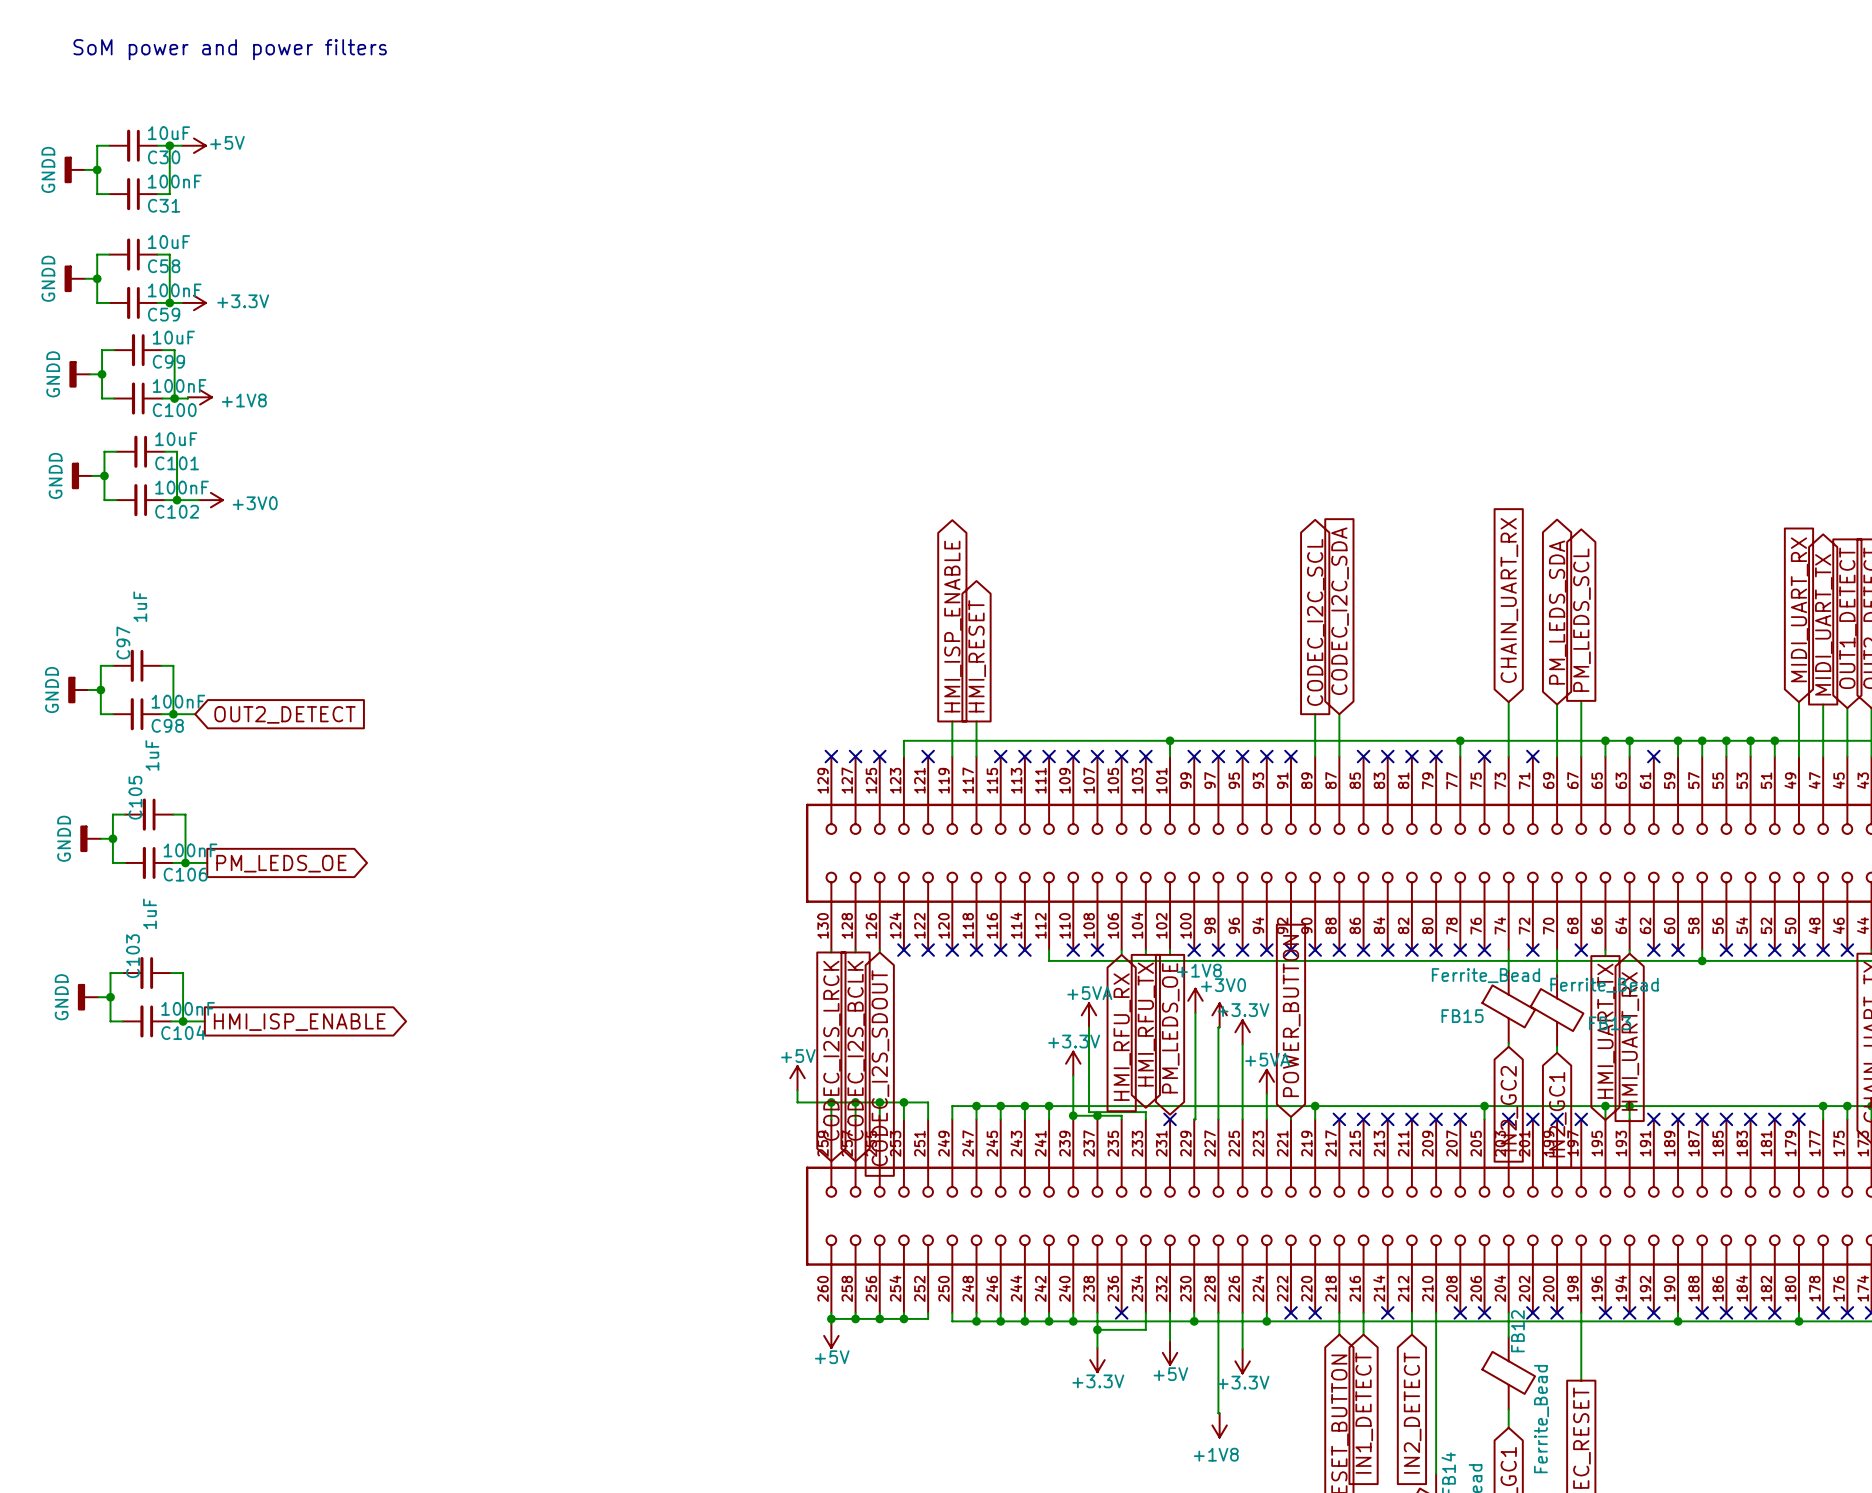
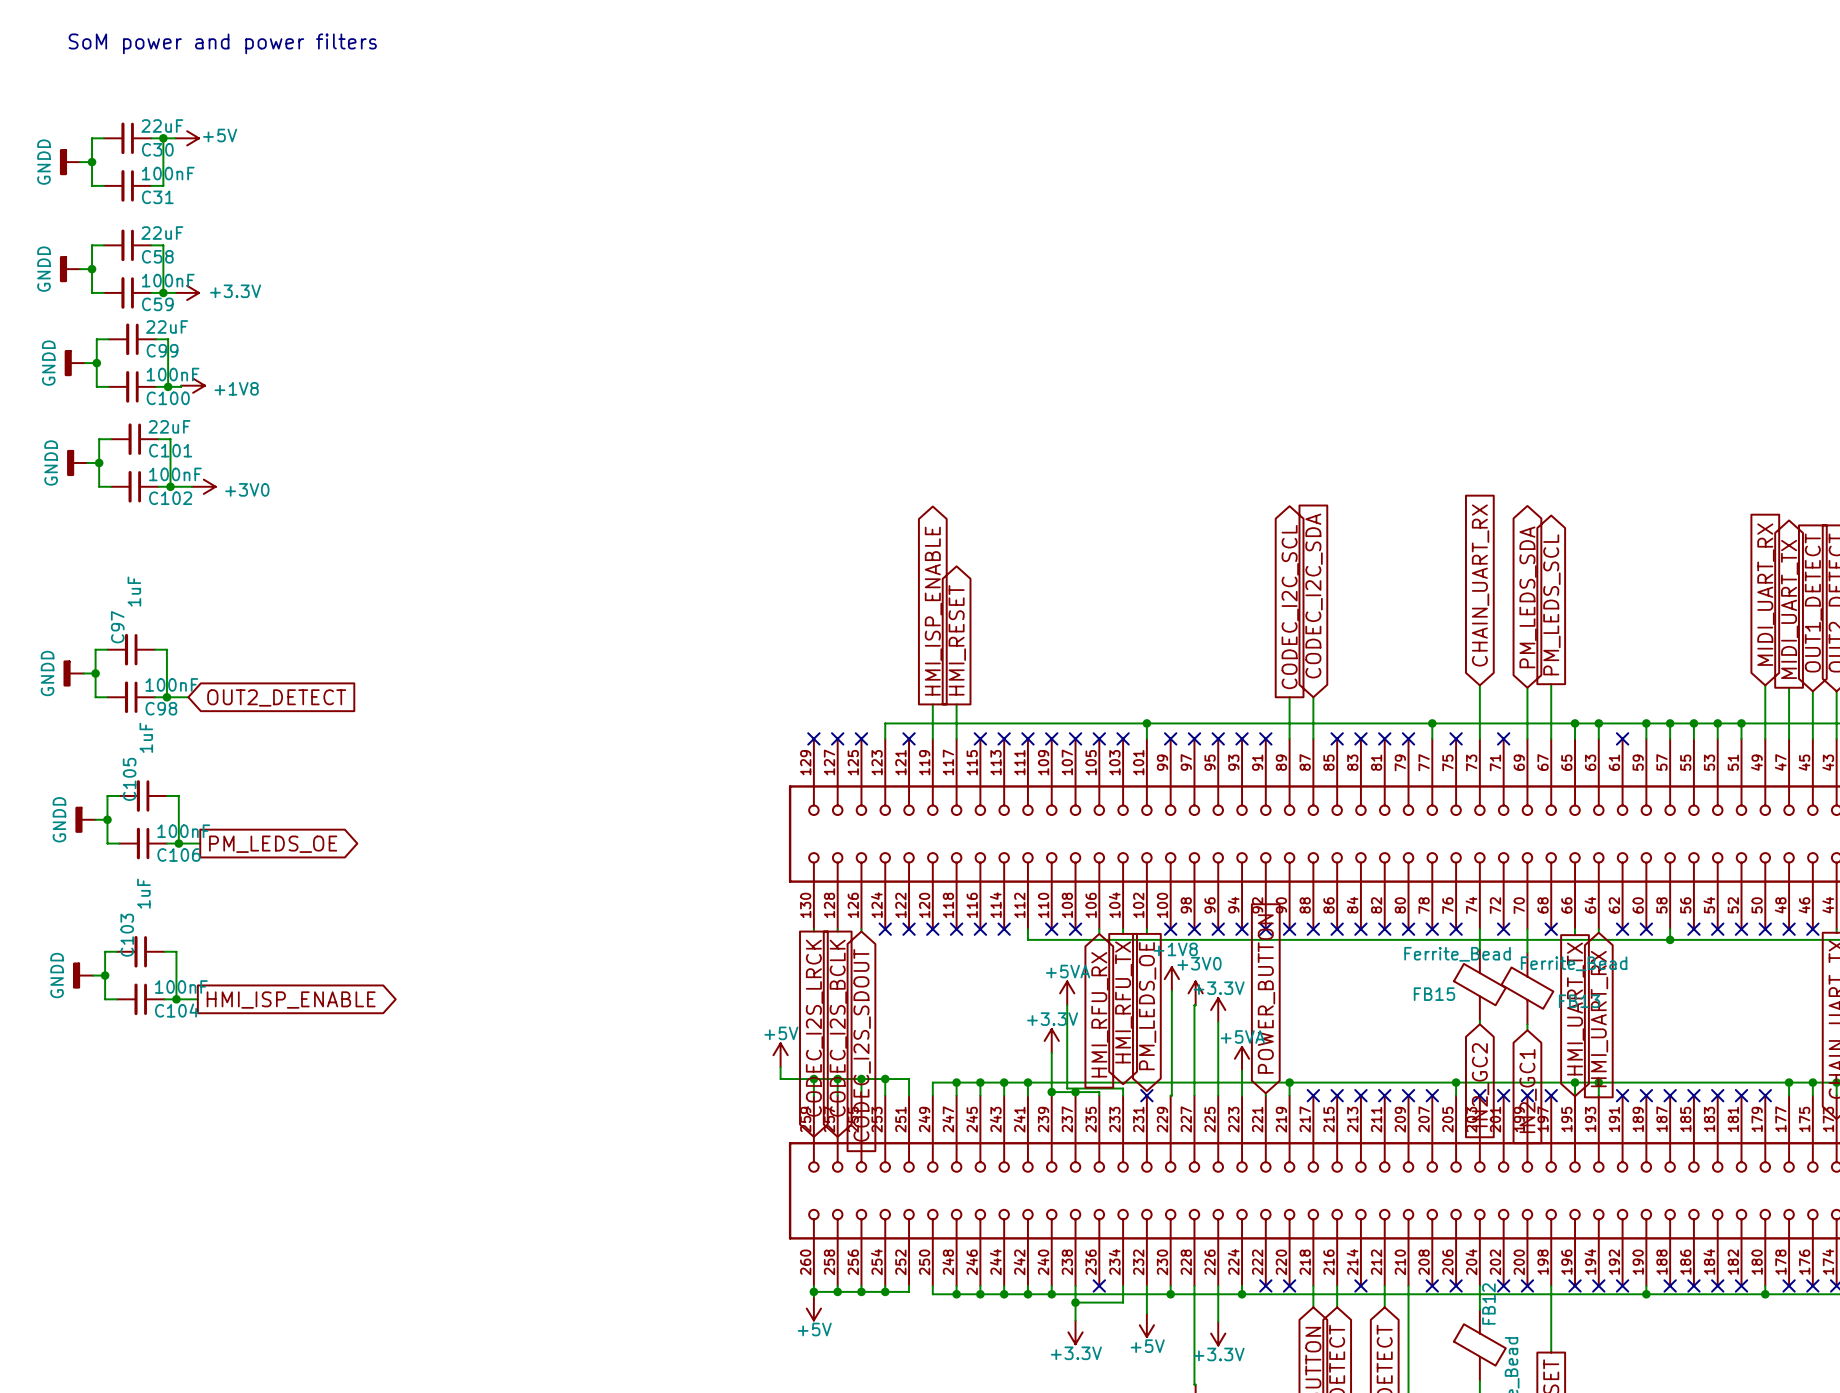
C30 value: 10uF (169, 133) -> 22uF (162, 125)
C58 value: 10uF (169, 242) -> 22uF (162, 233)
C99 value: 10uF (173, 337) -> 22uF (167, 326)
C101 value: 10uF (176, 439) -> 22uF (169, 426)

